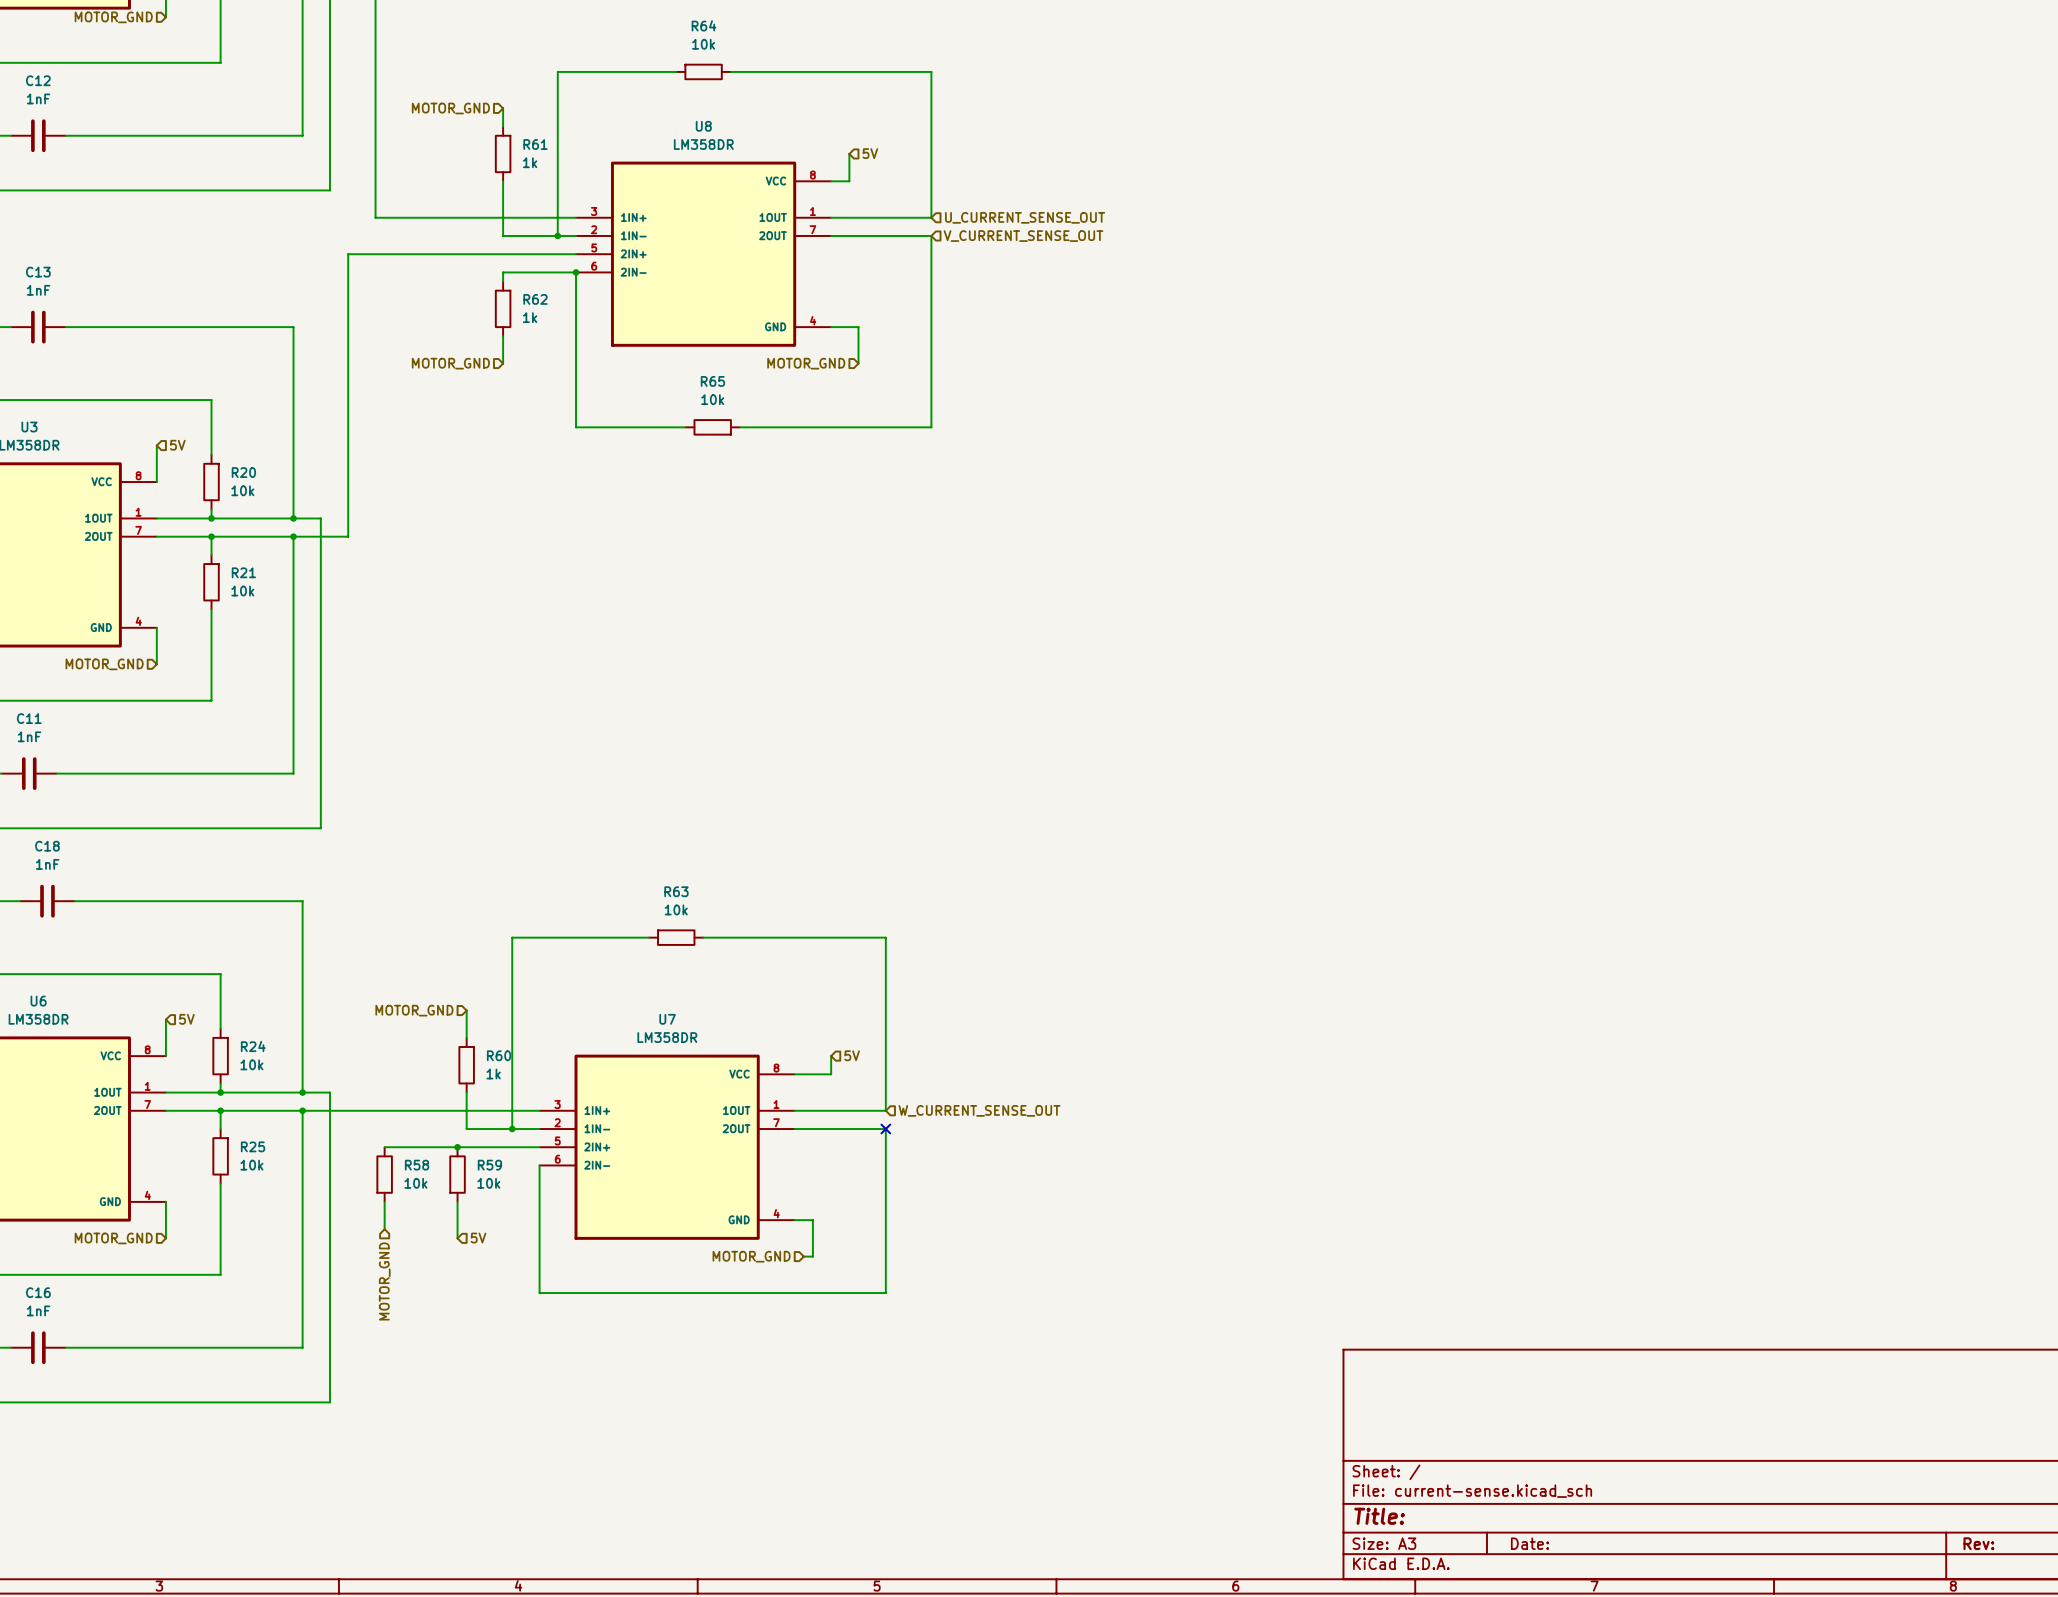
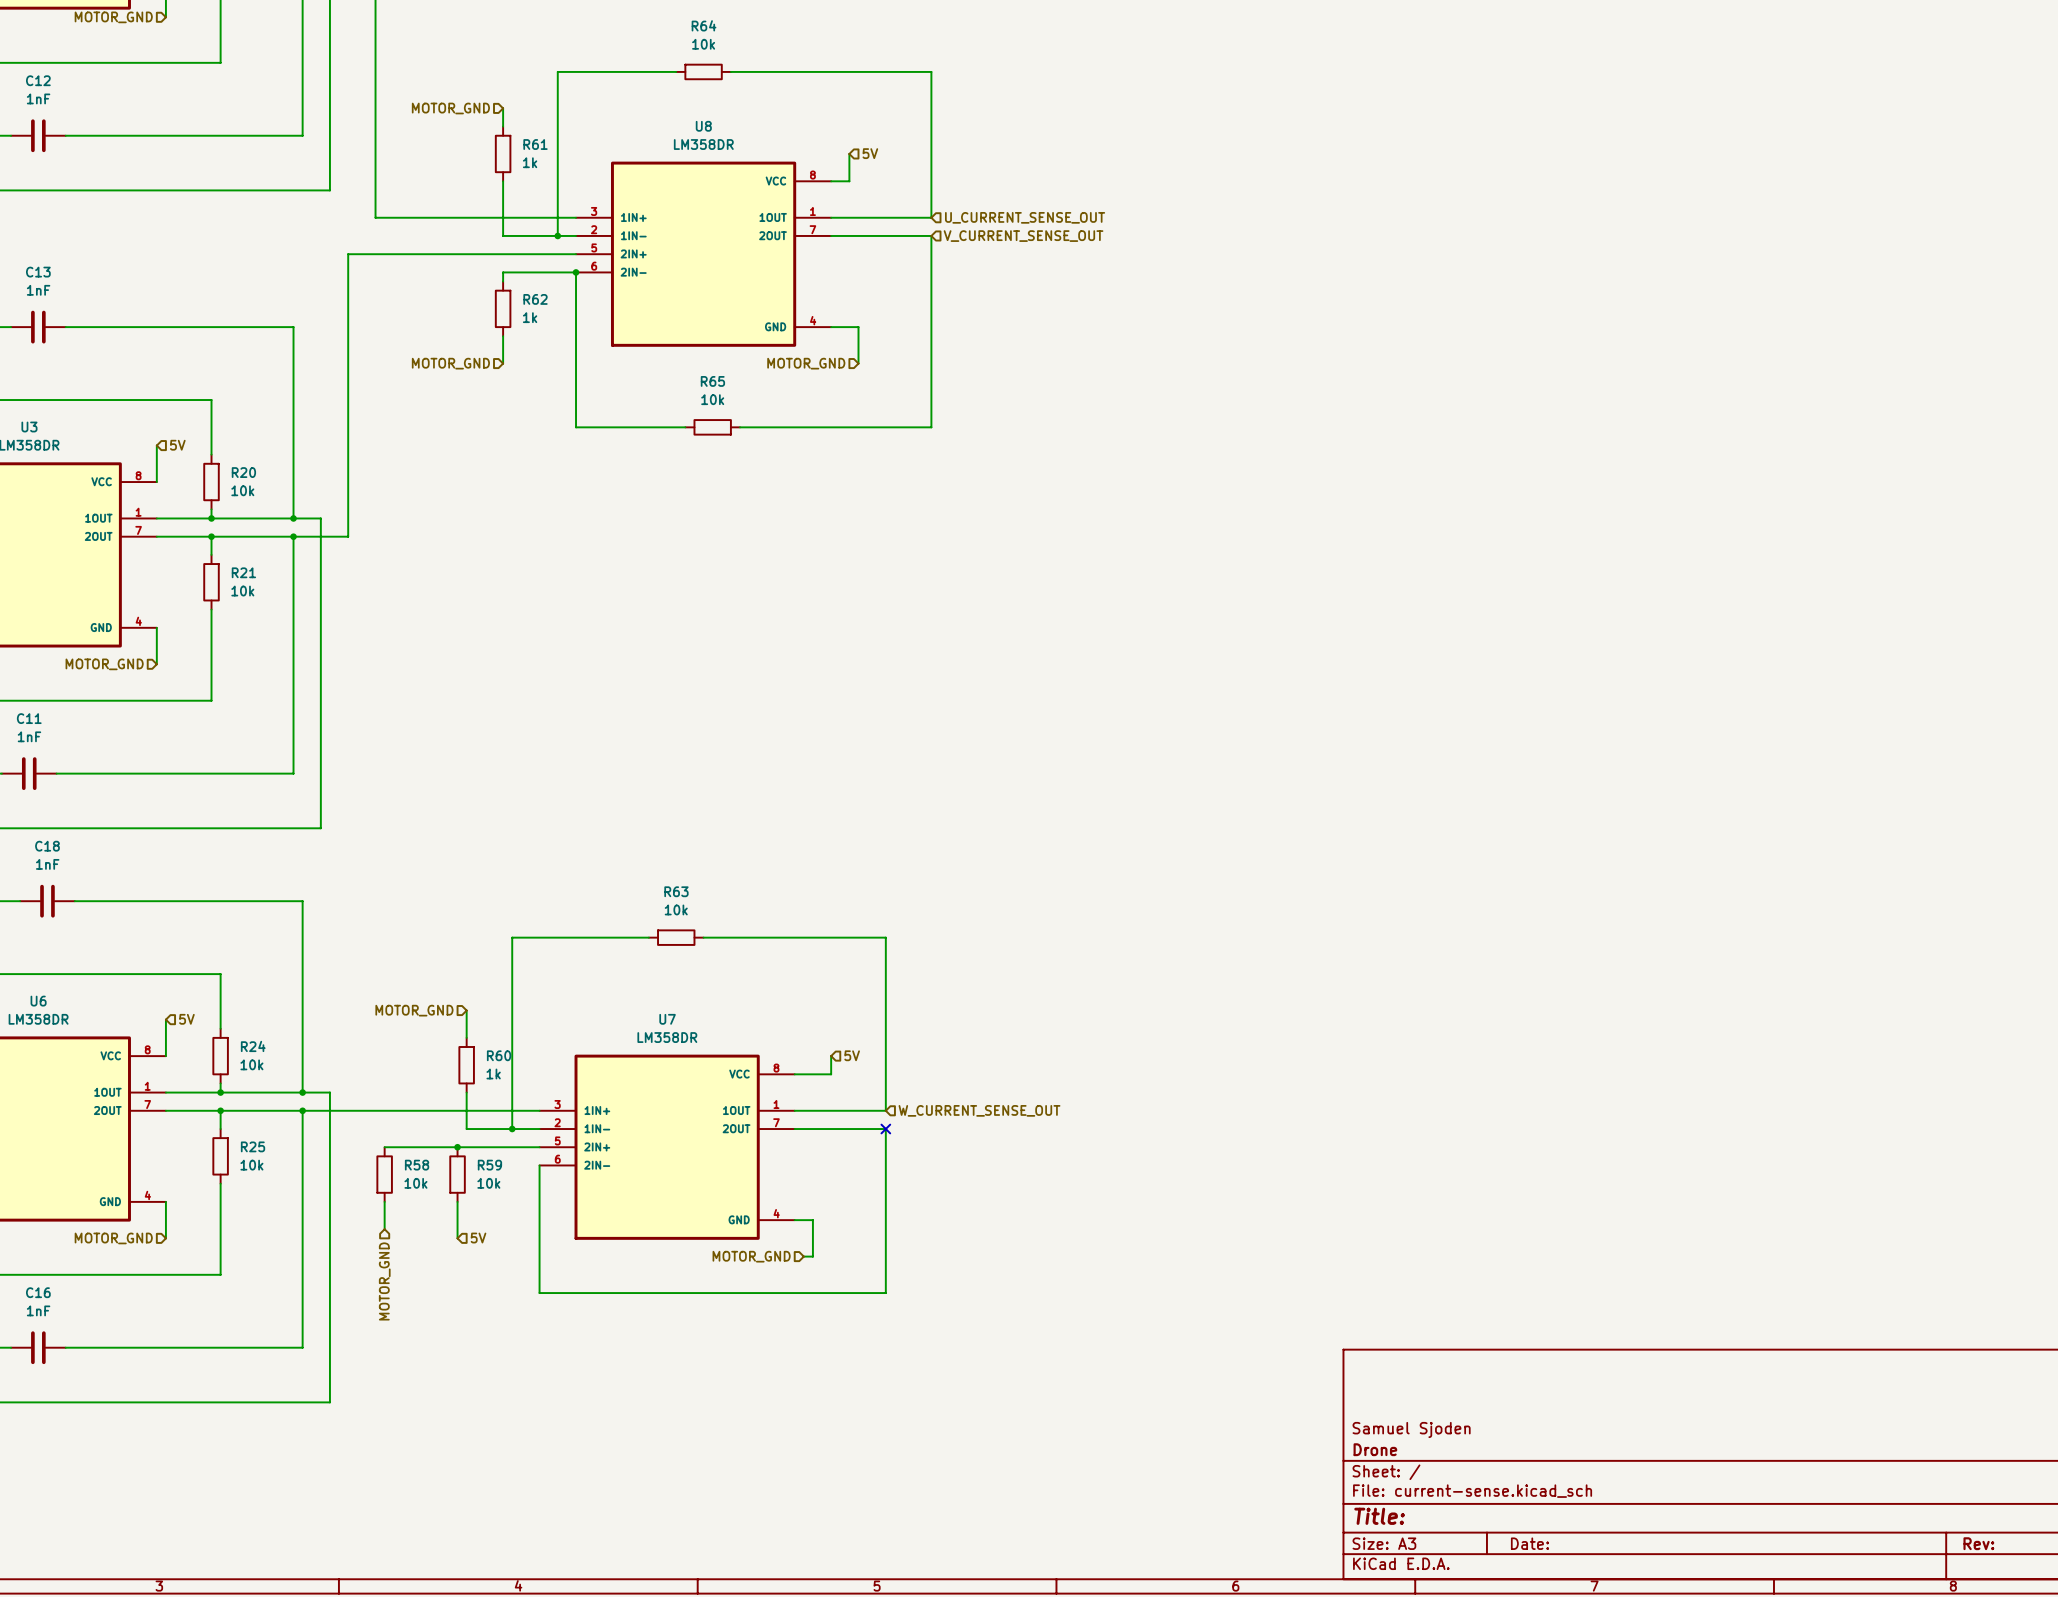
title block: none -> Samuel Sjoden (1411, 1429)
title block: none -> Drone (1375, 1449)

